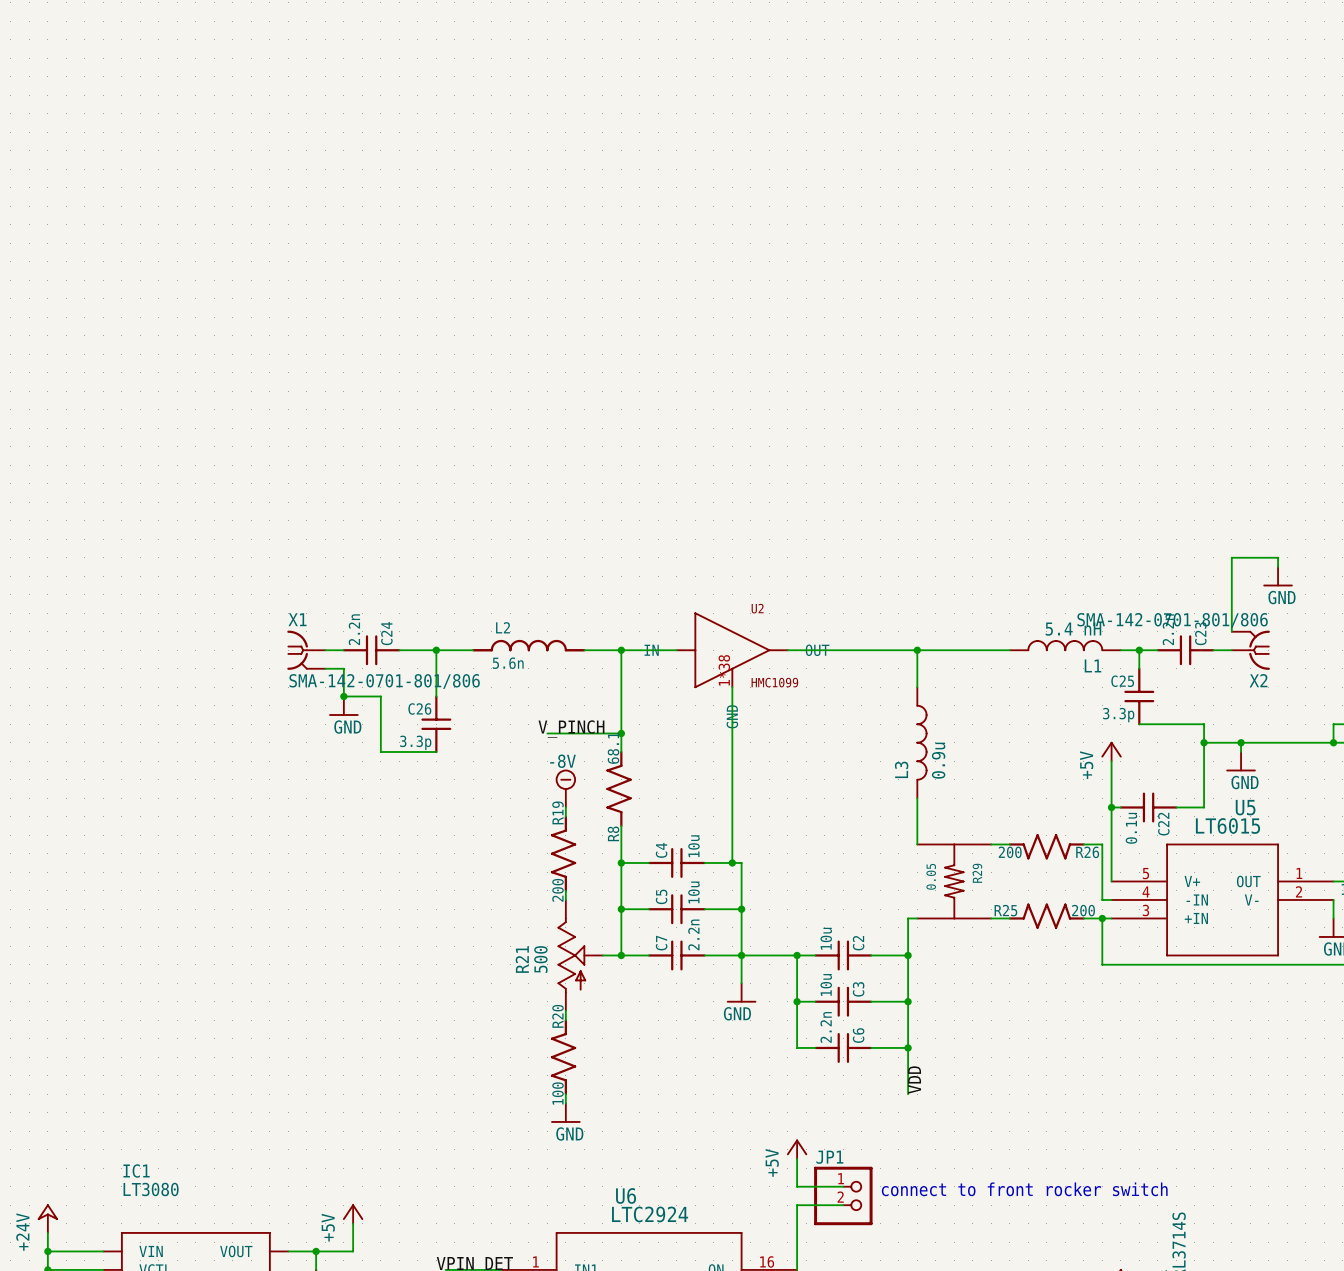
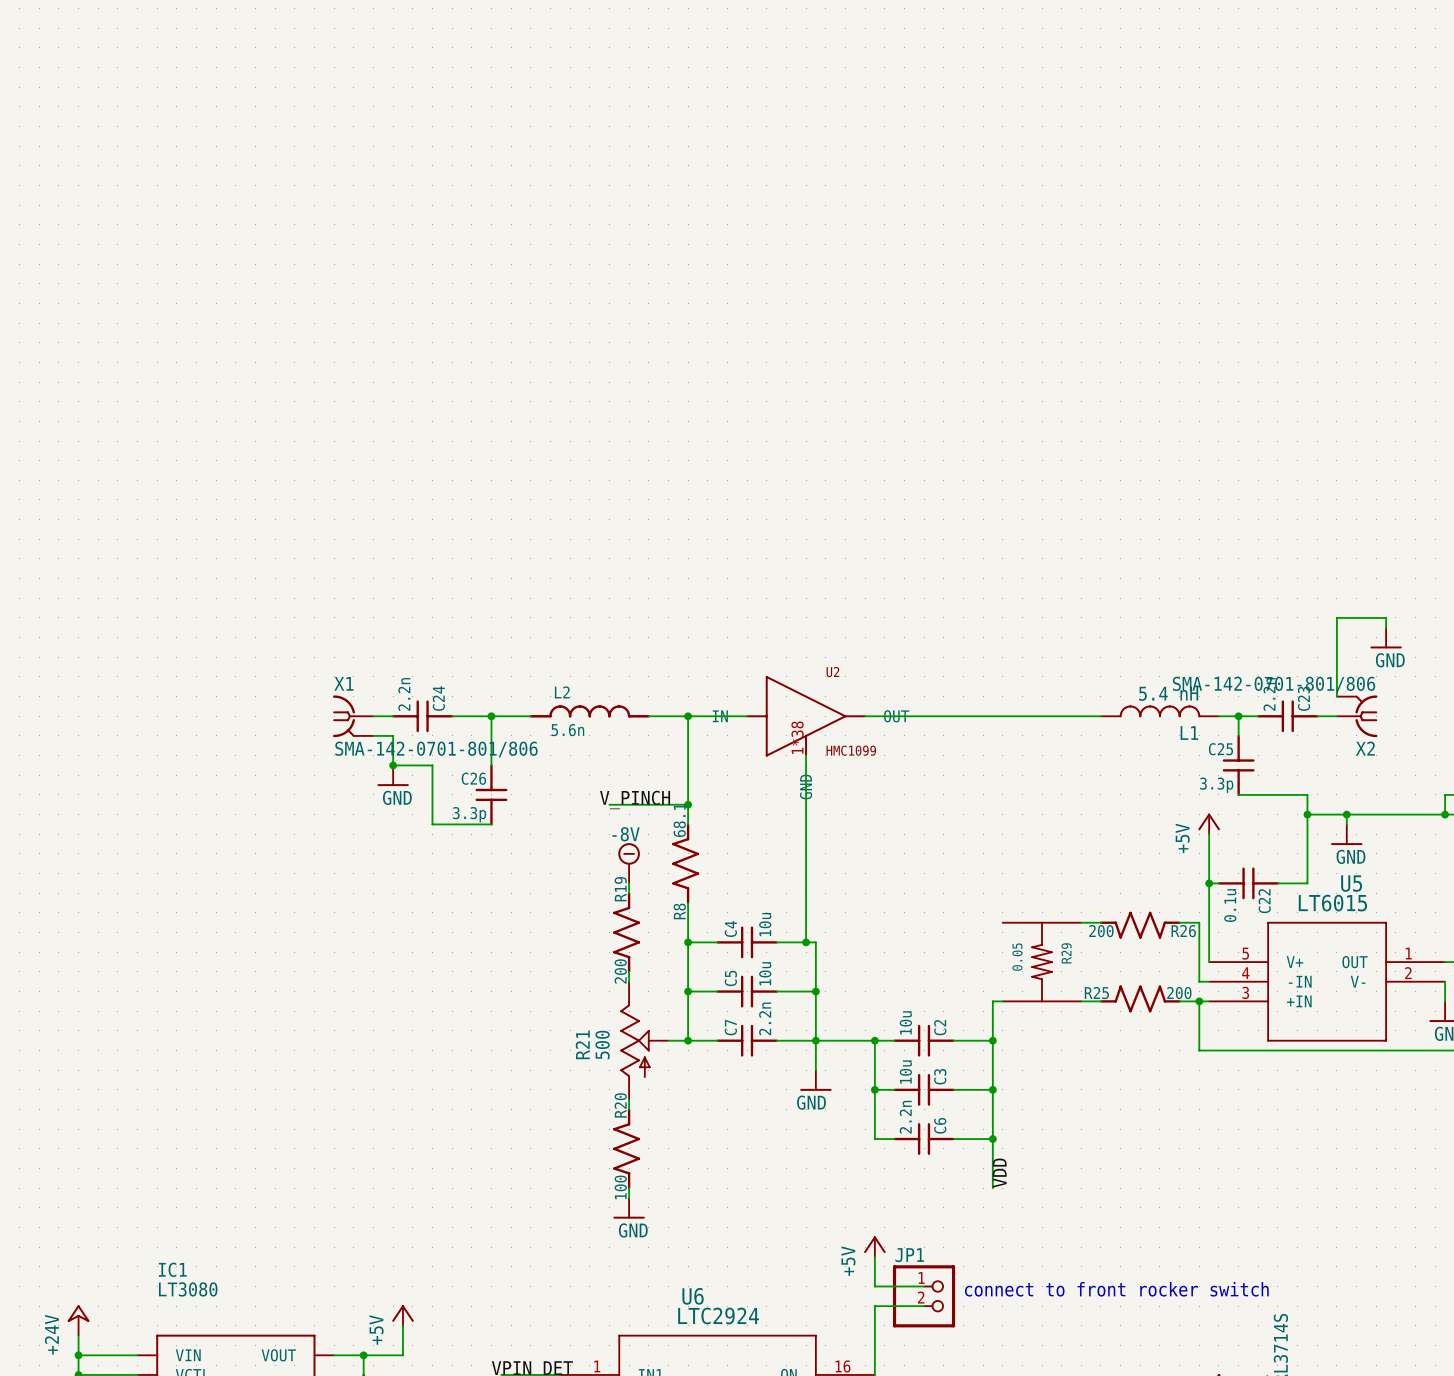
wire: (917, 650) (917, 687) -> none
junction: (917, 650) -> none
L3: 0.9u (921, 742) -> none
wire: (917, 798) (917, 844) -> none

